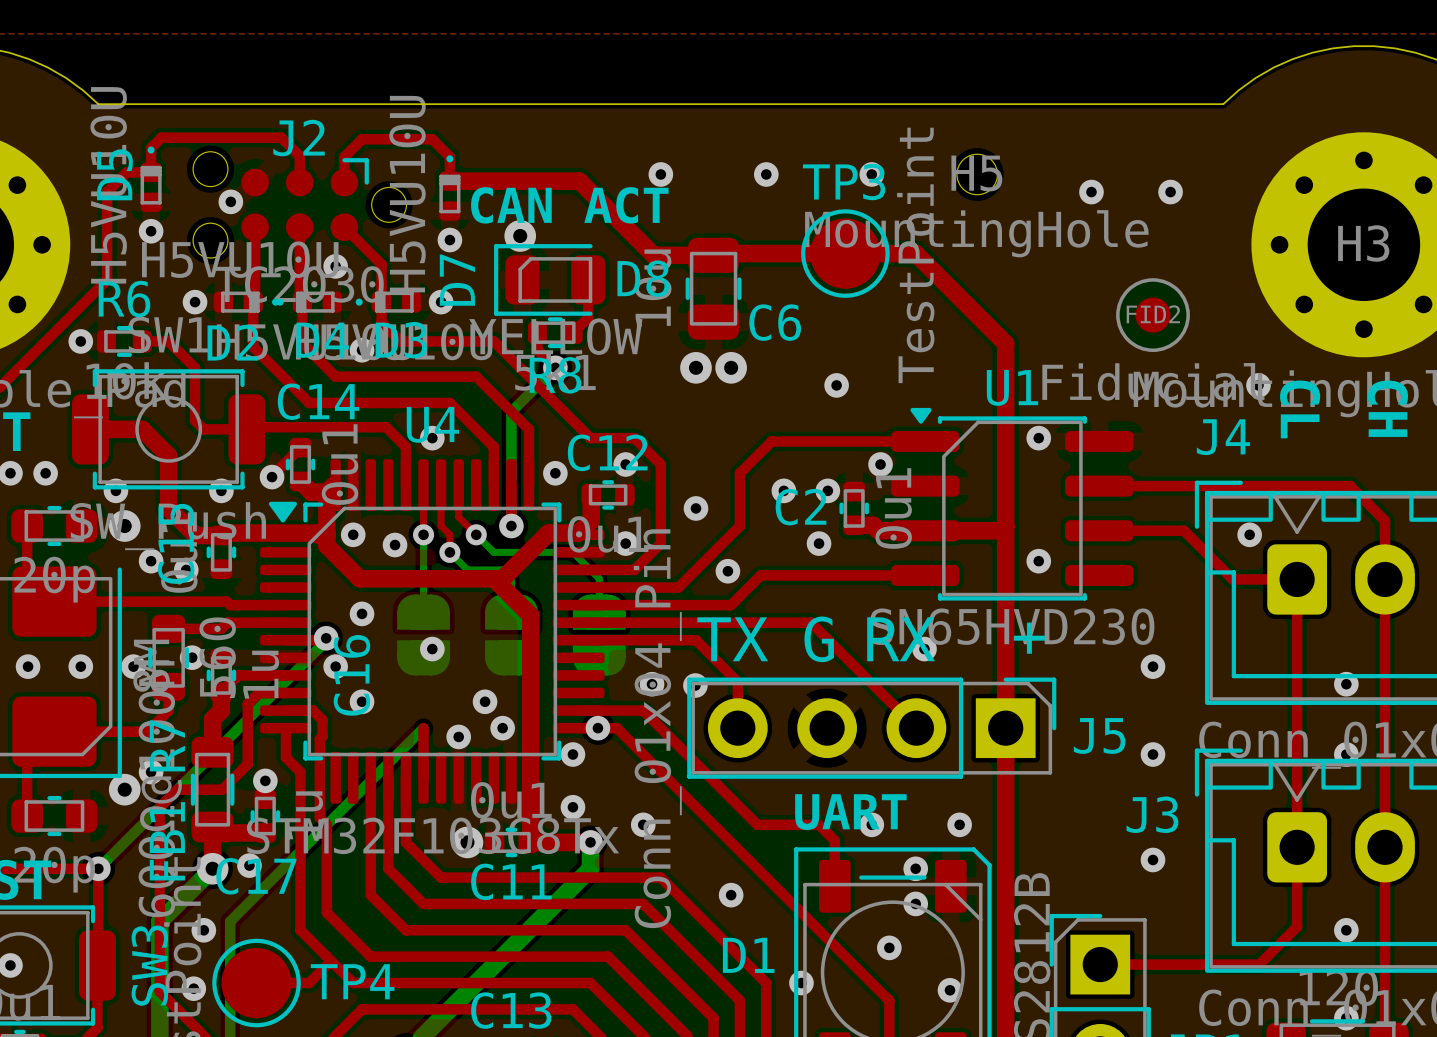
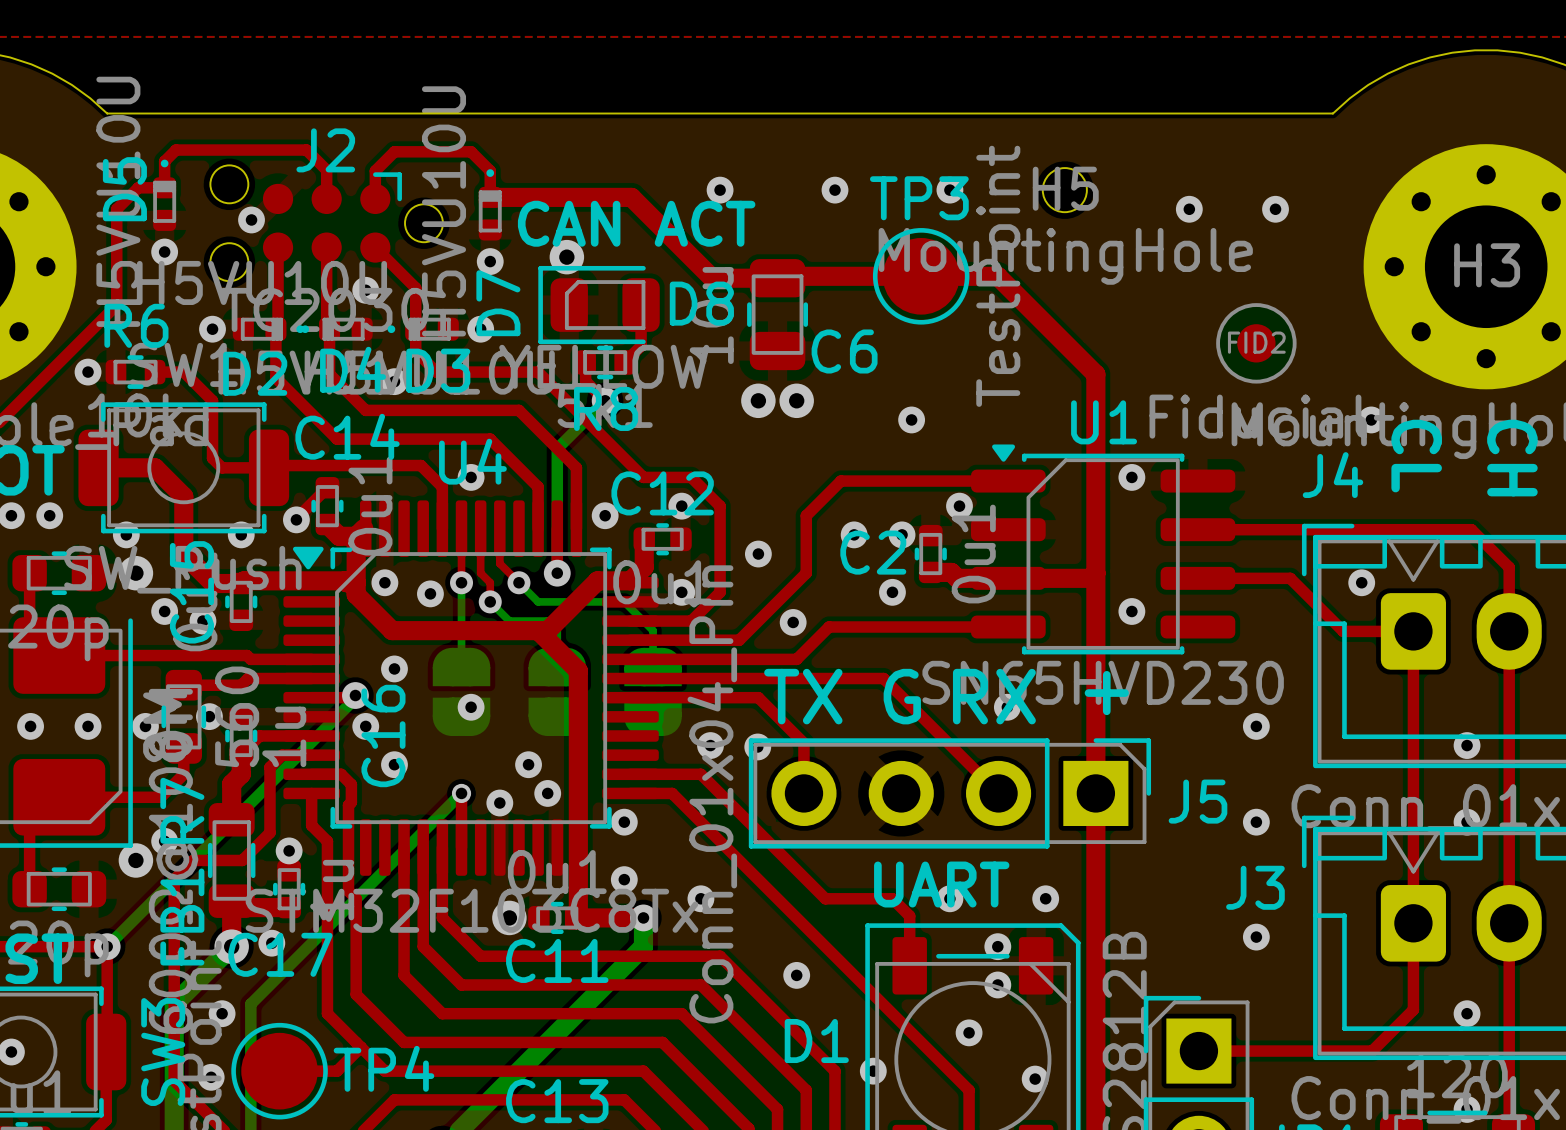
via: none -> (461, 793)
via: (597, 728) -> none

